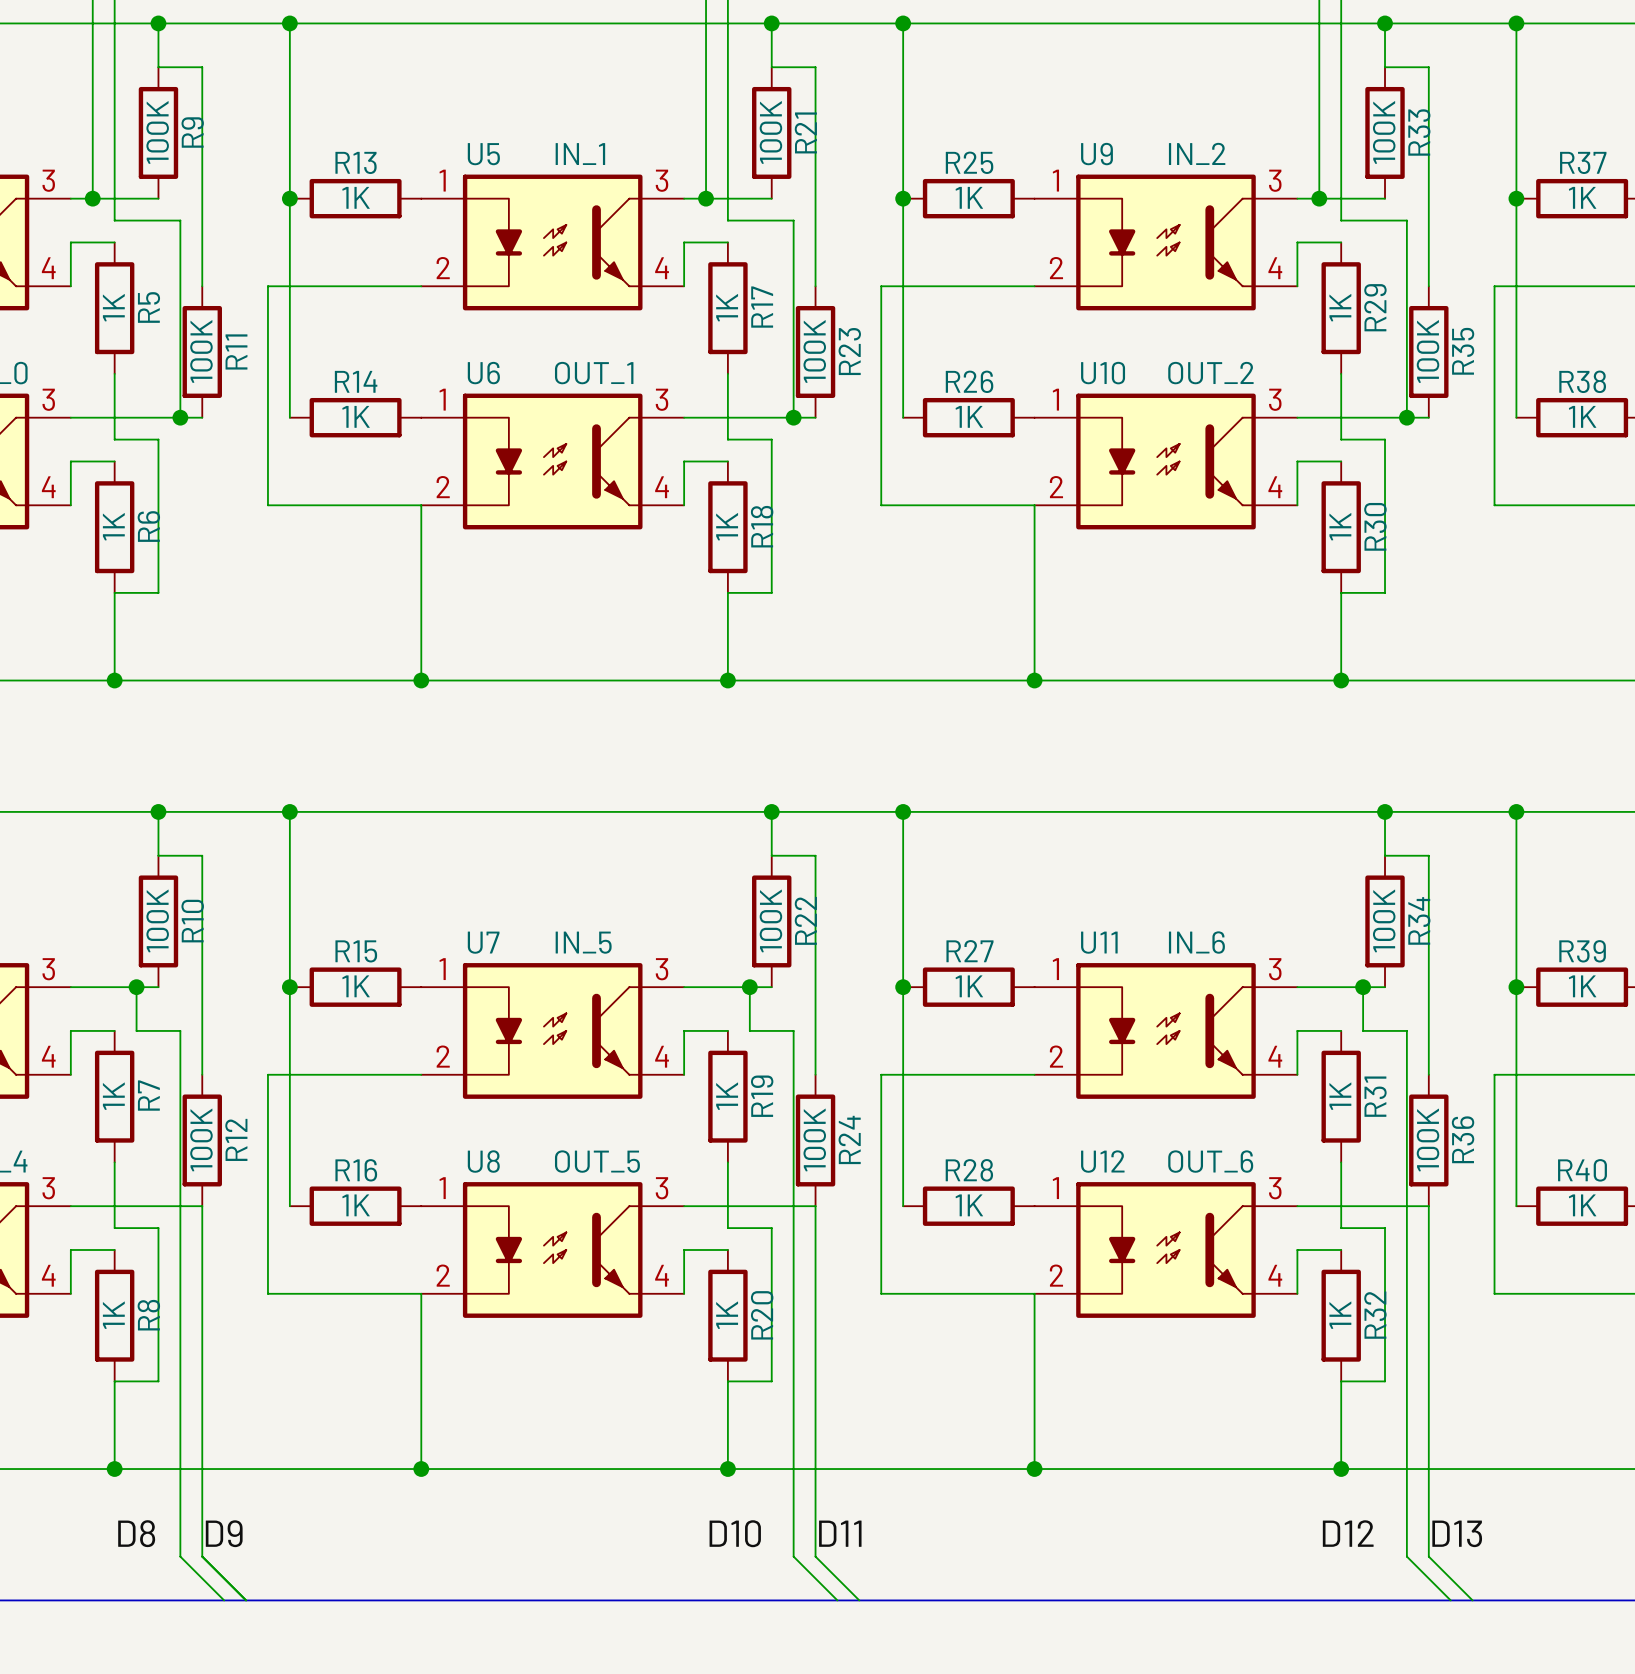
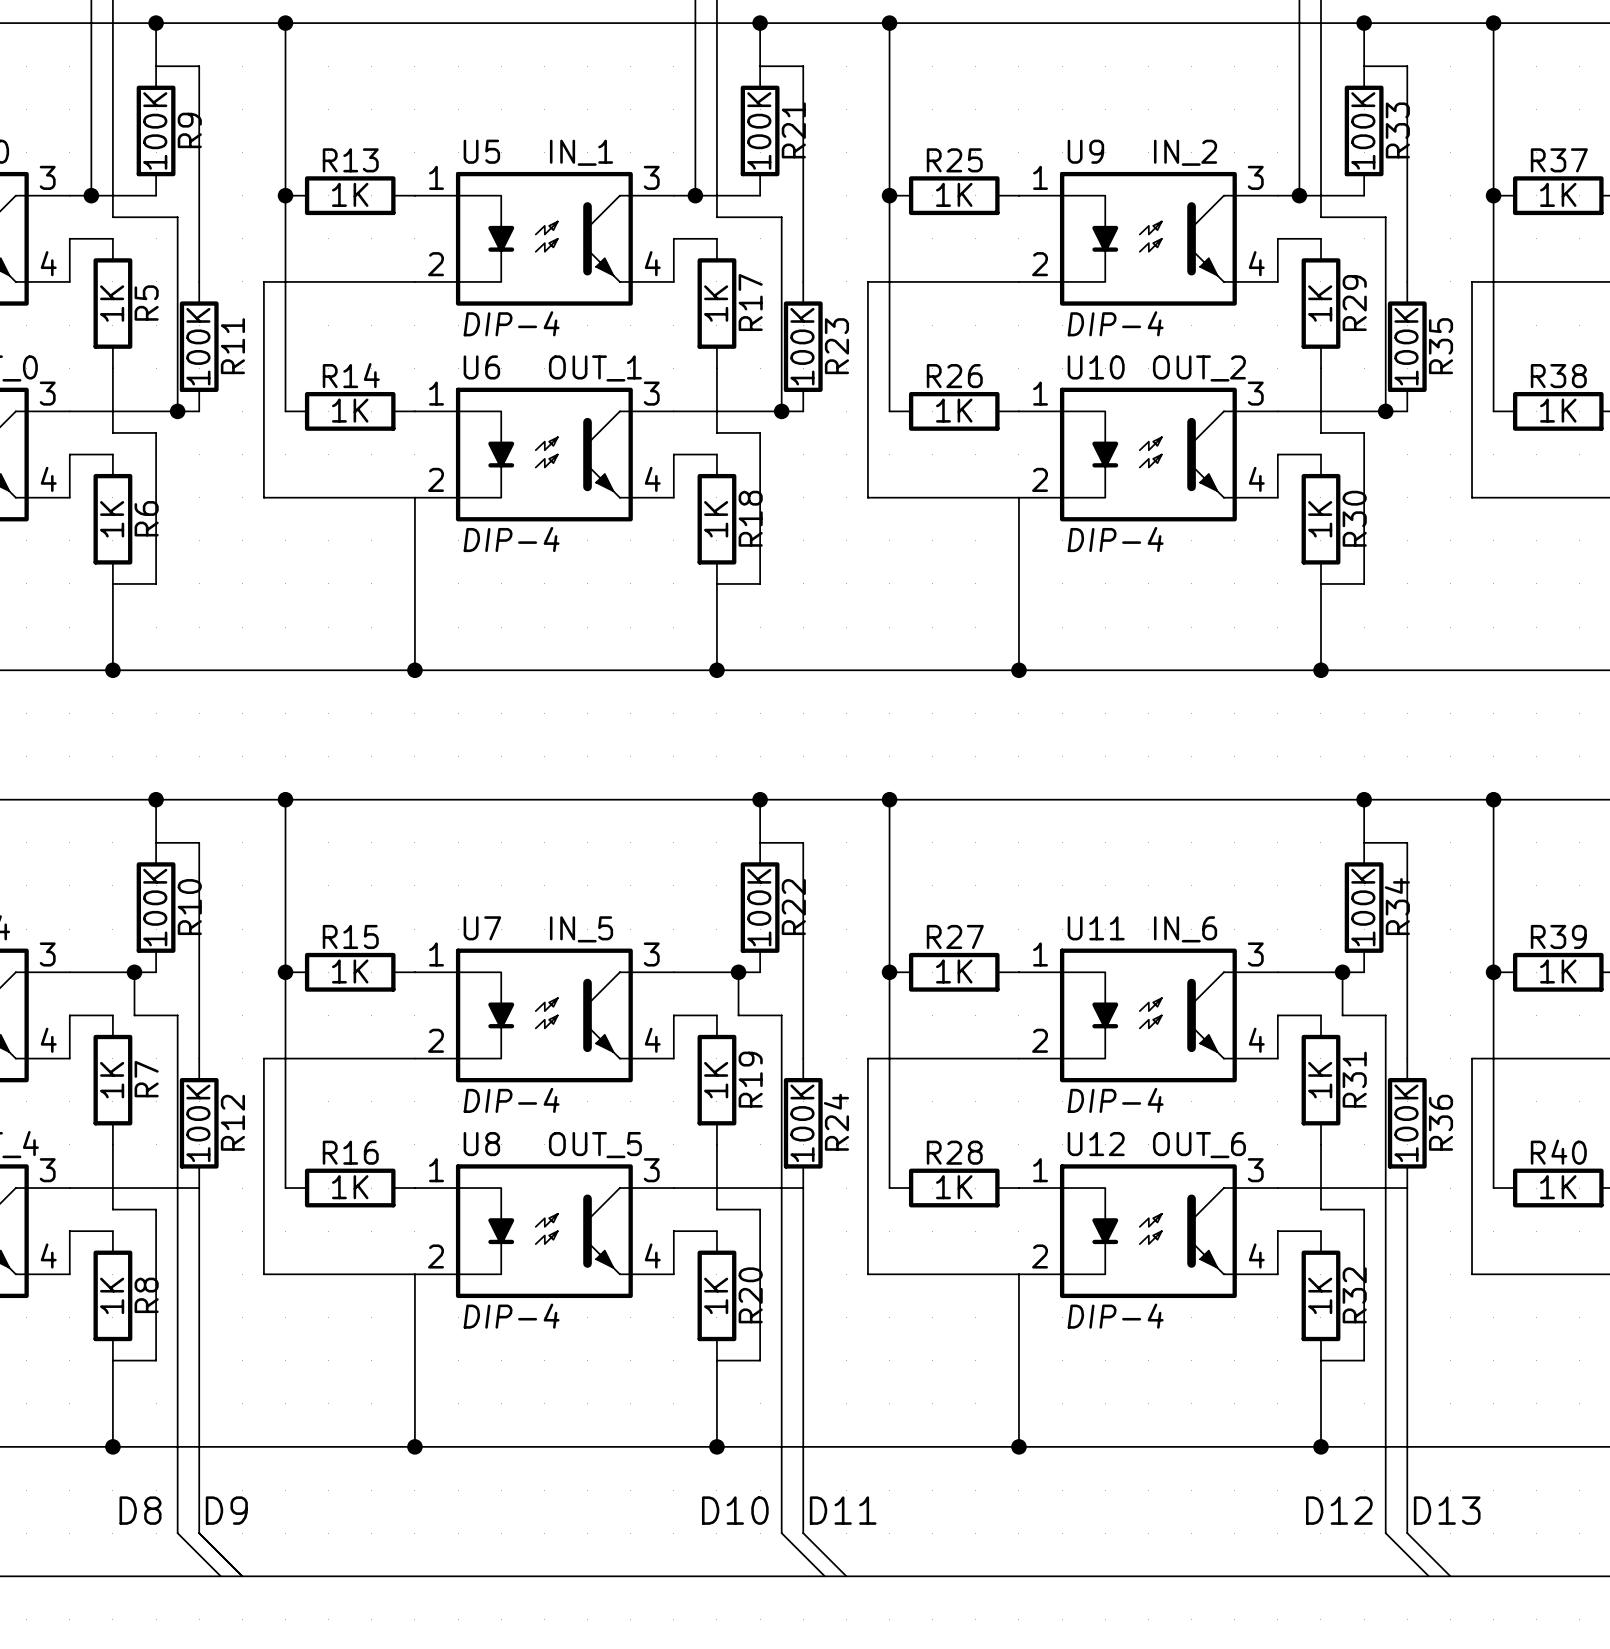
U5 text: none -> DIP-4 (511, 323)
U9 text: none -> DIP-4 (1115, 323)
U6 text: none -> DIP-4 (511, 539)
U10 text: none -> DIP-4 (1115, 539)
U7 text: none -> DIP-4 (511, 1100)
U11 text: none -> DIP-4 (1115, 1100)
U8 text: none -> DIP-4 (511, 1316)
U12 text: none -> DIP-4 (1115, 1316)

